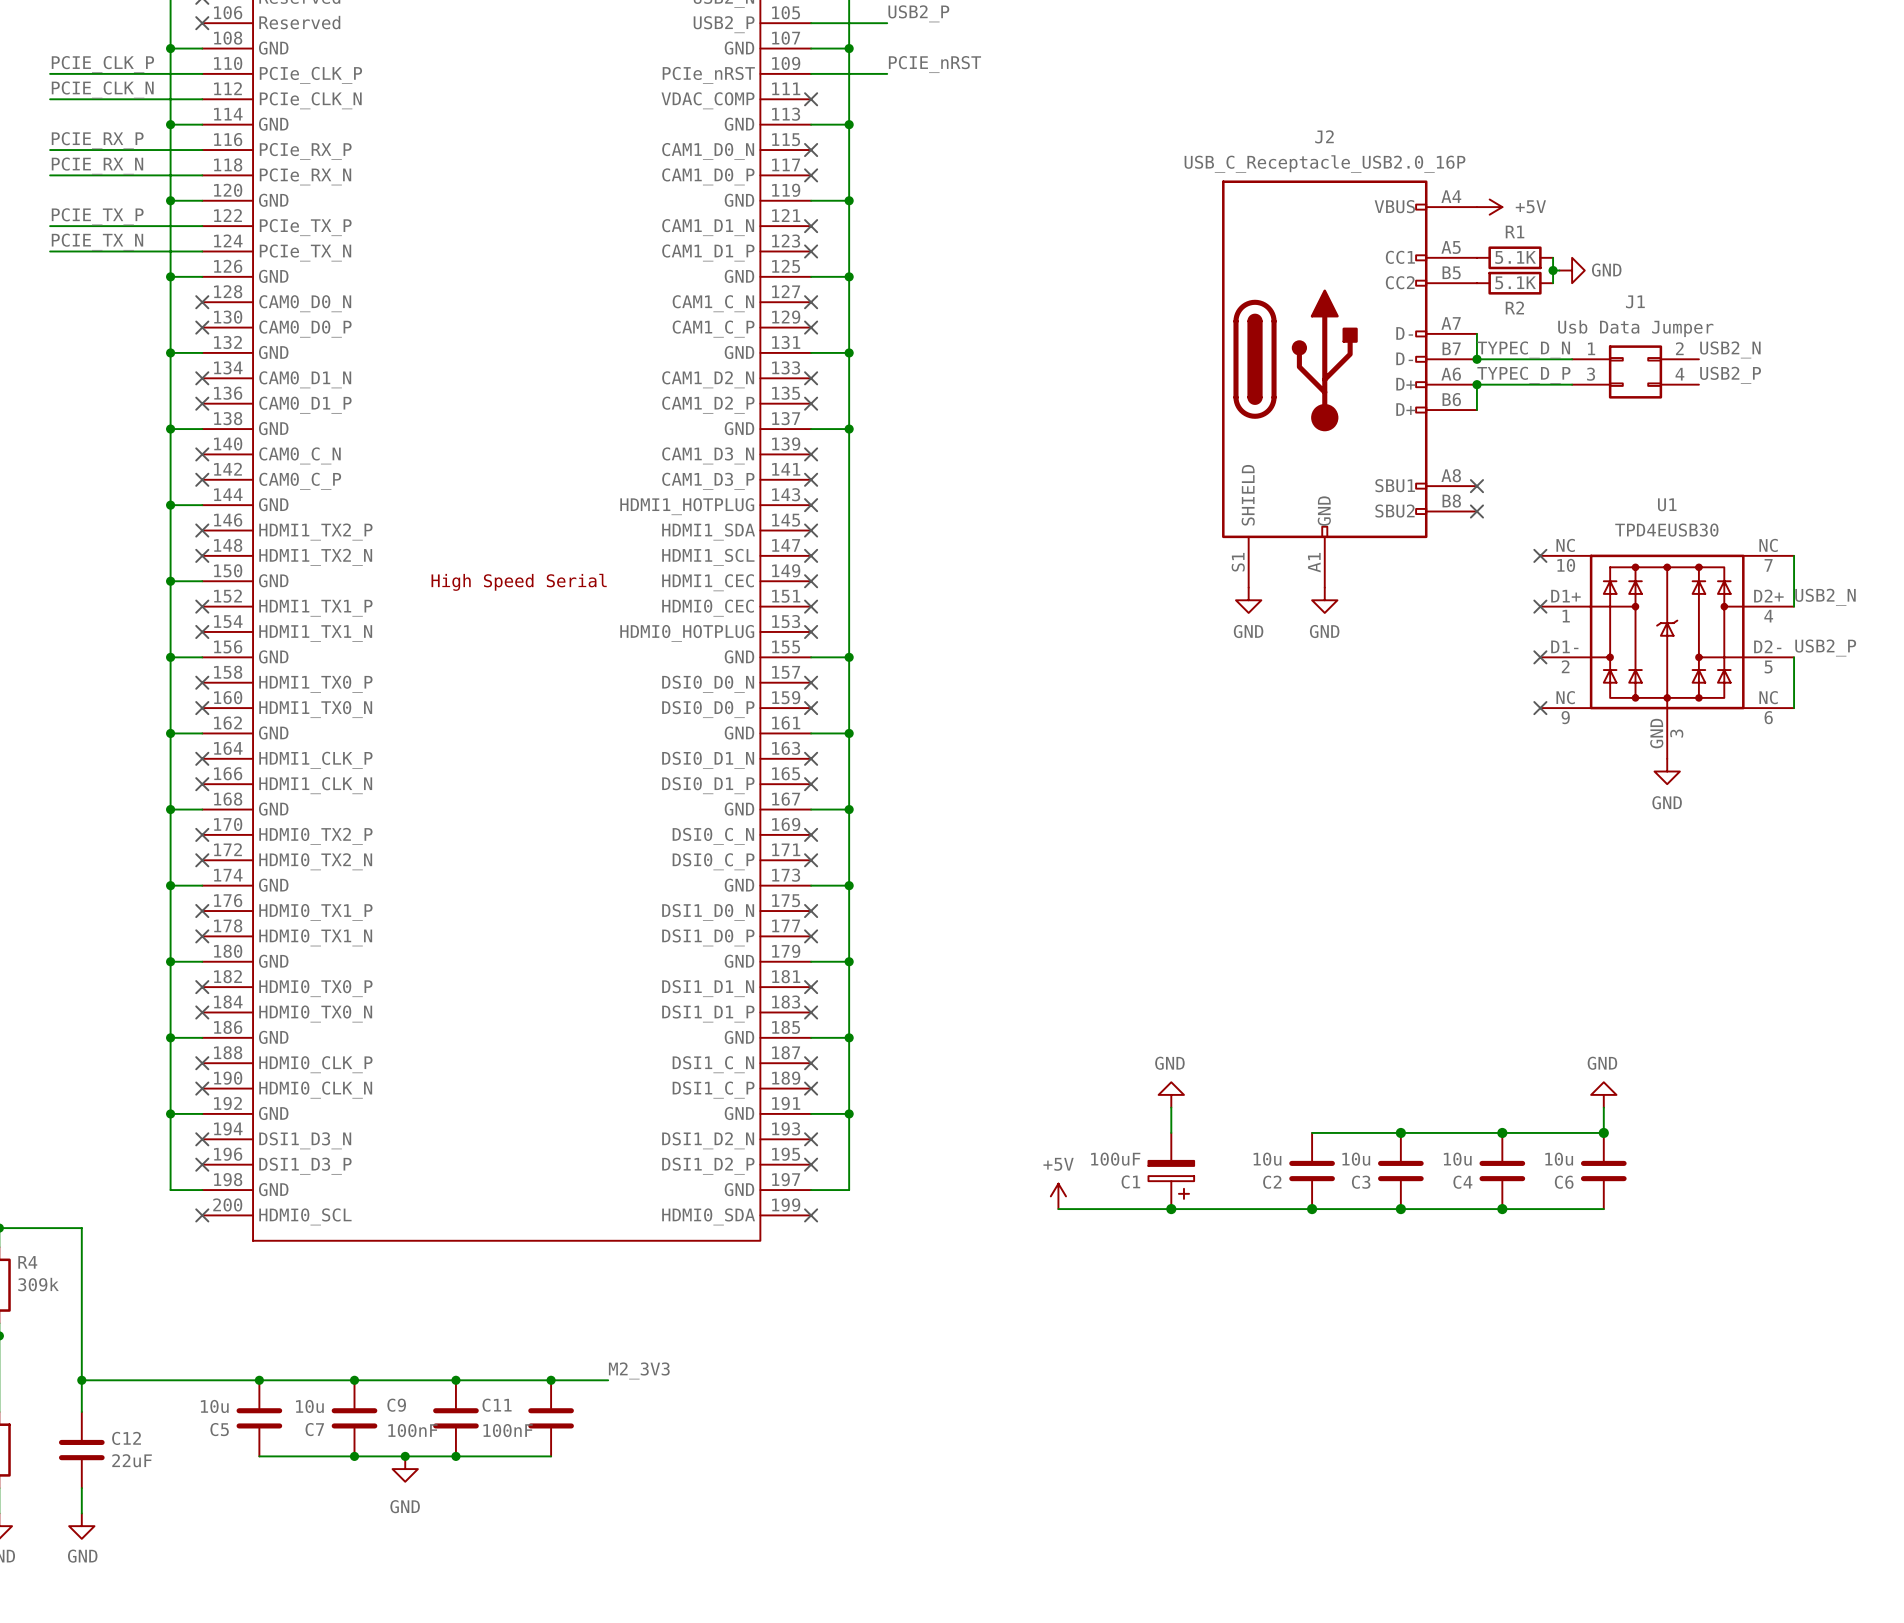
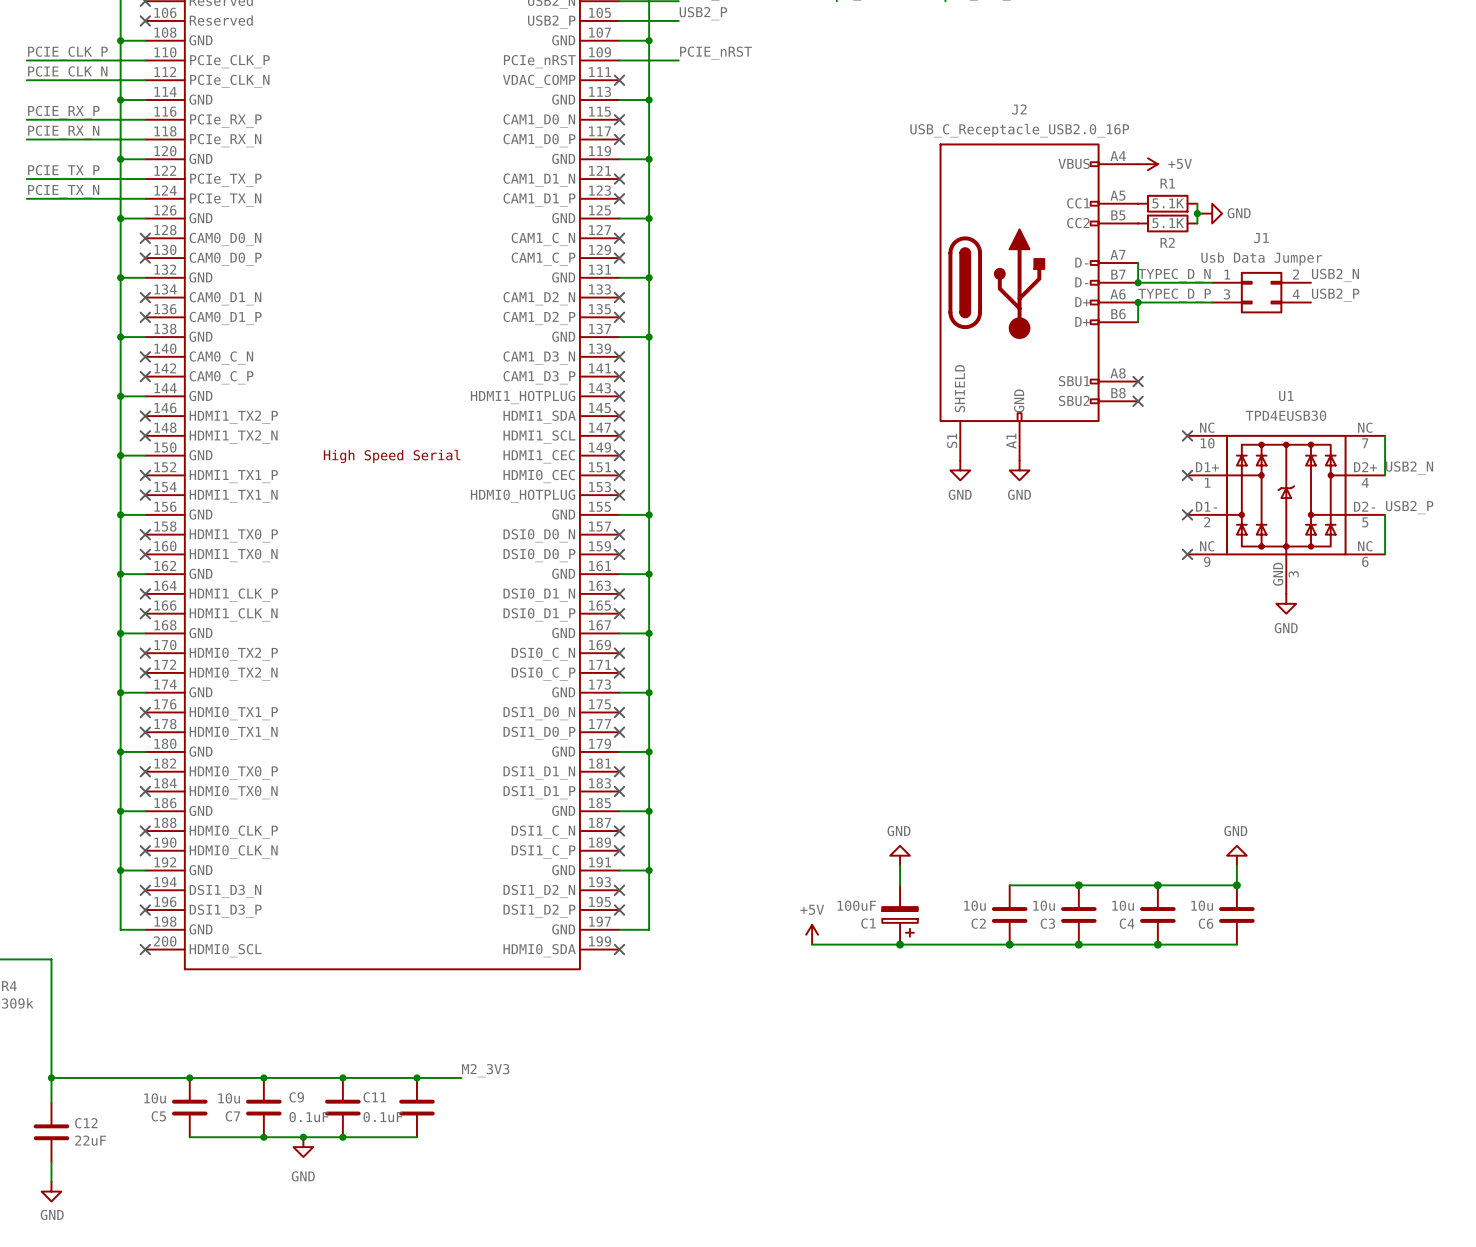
C9 value: 100nF (412, 1430) -> 0.1uF (308, 1117)
C11 value: 100nF (508, 1430) -> 0.1uF (383, 1117)

